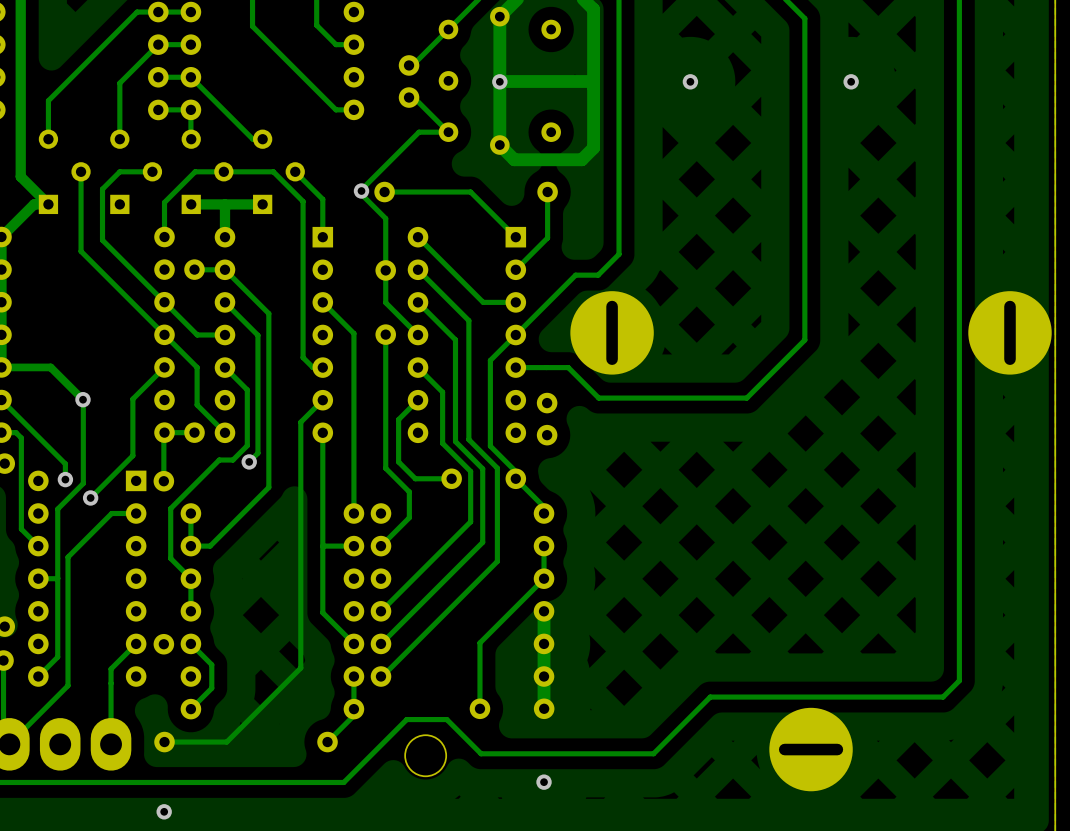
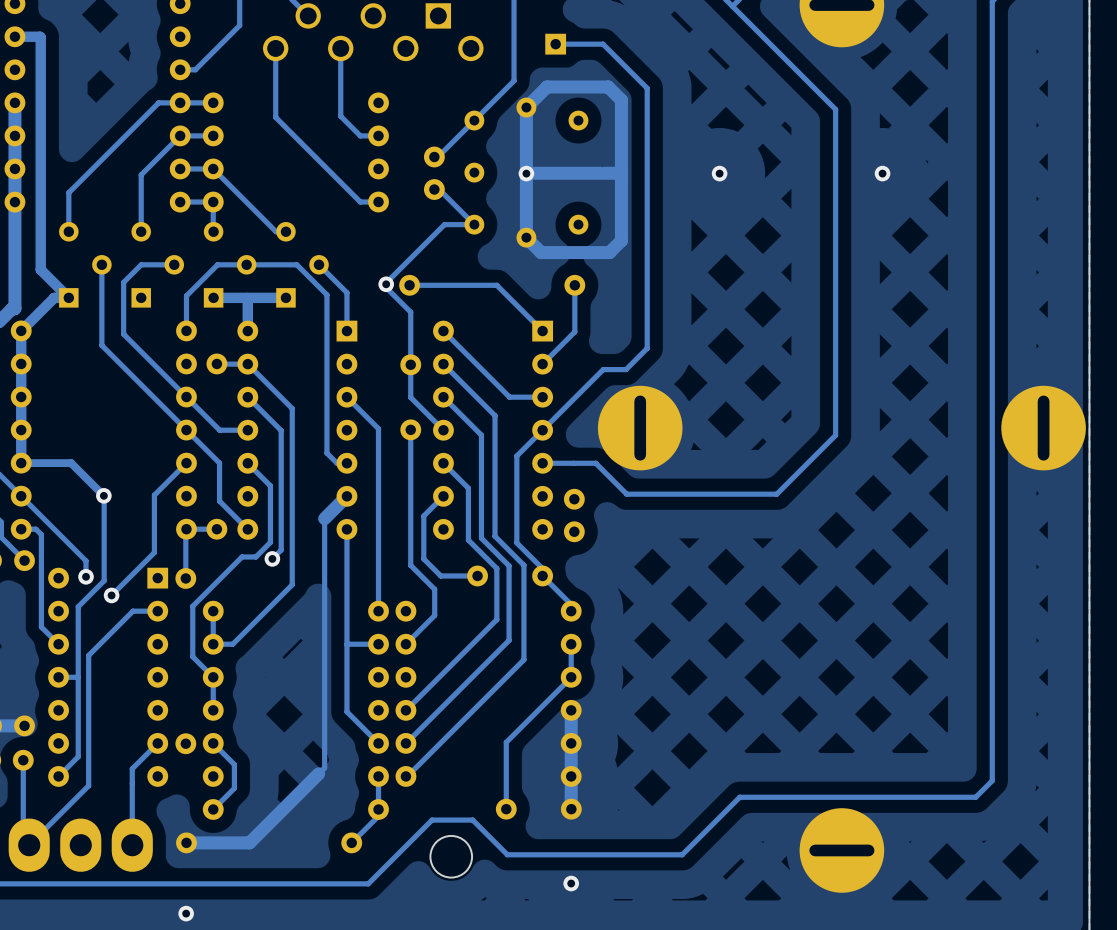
track width: thin (322, 400) (300, 422) -> thick (346, 496) (324, 518)
track width: thin (294, 673) (226, 742) (164, 742) -> thick (318, 773) (249, 842) (186, 842)

